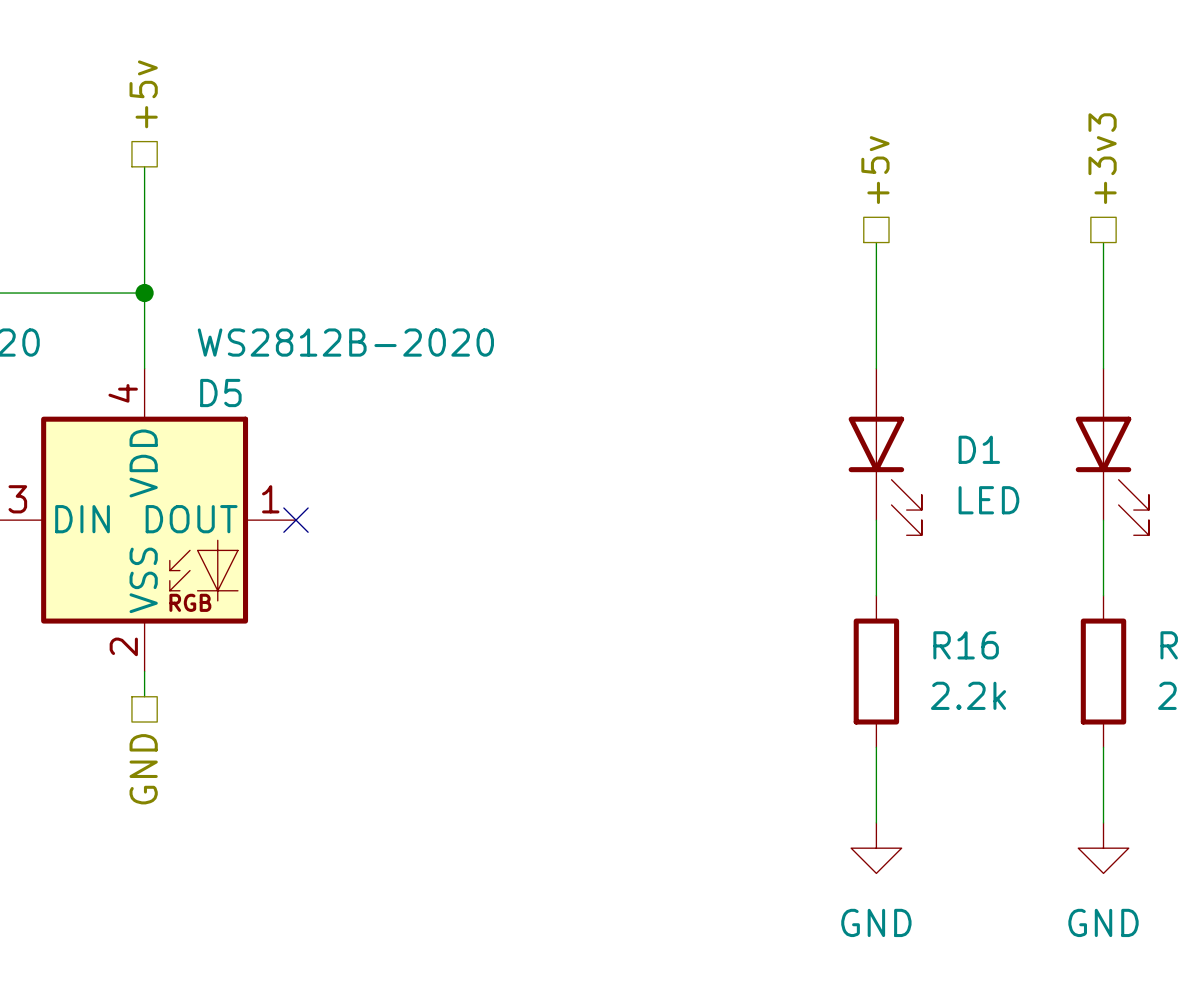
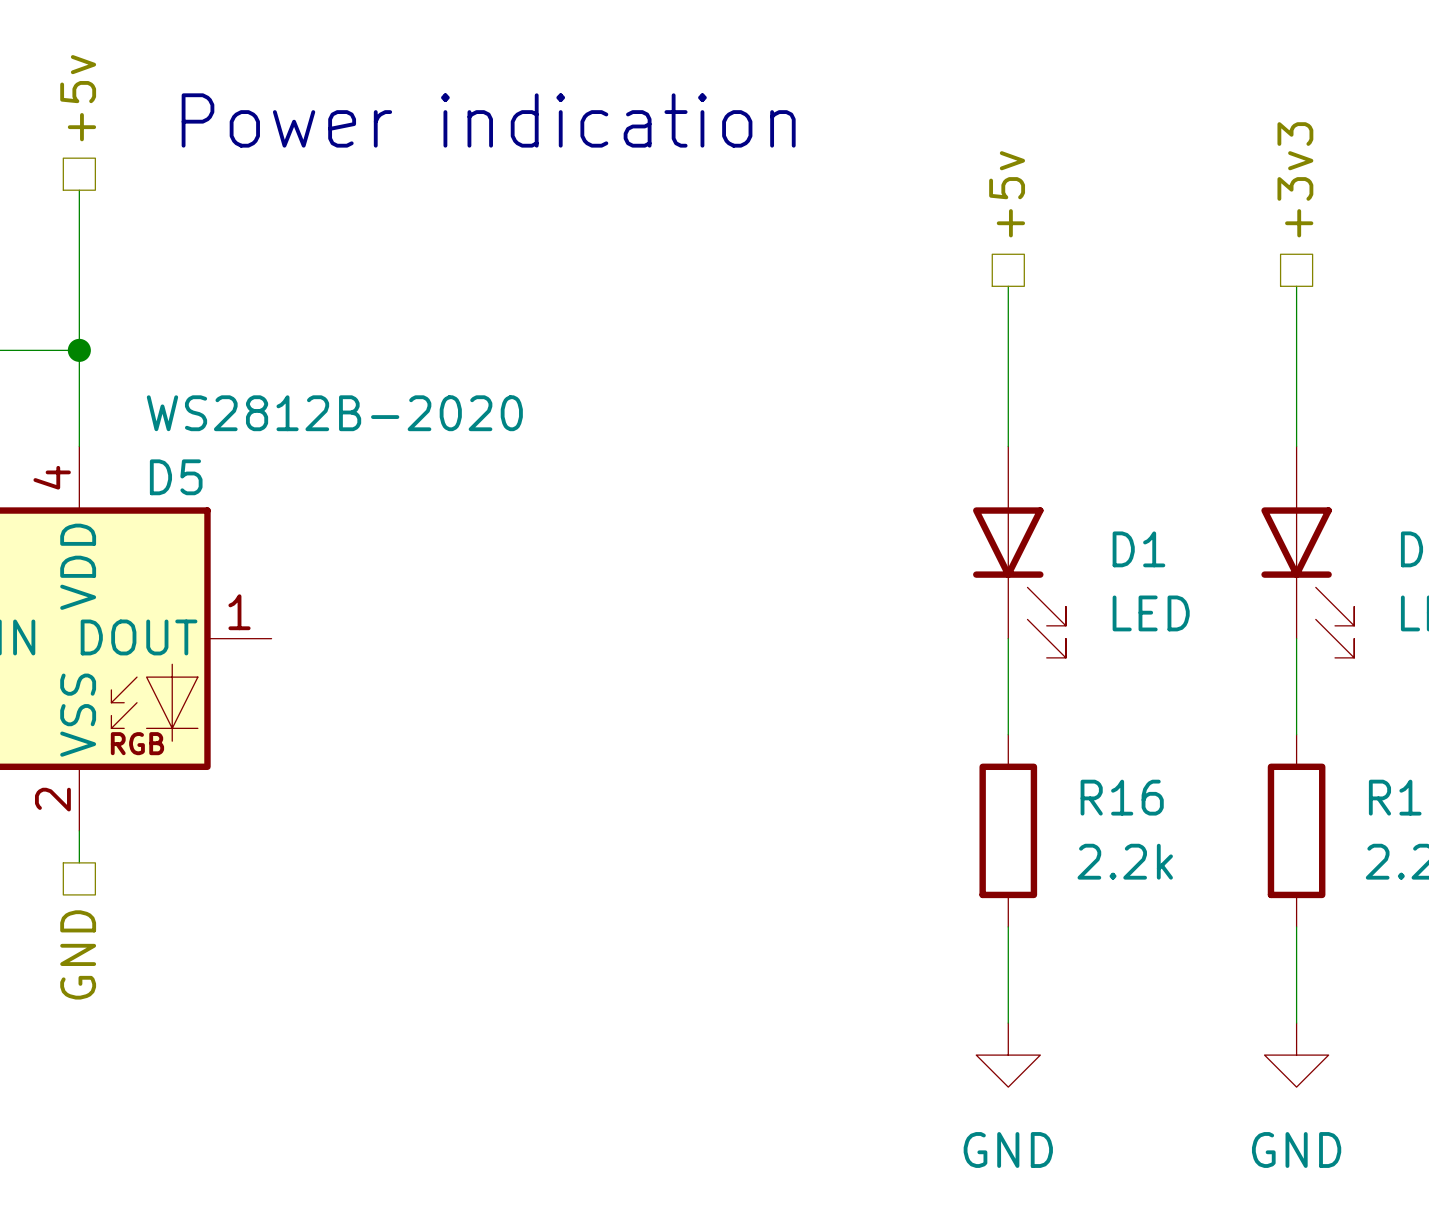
text: none -> Power indication (488, 120)
no-connect mark: (295, 520) -> none

